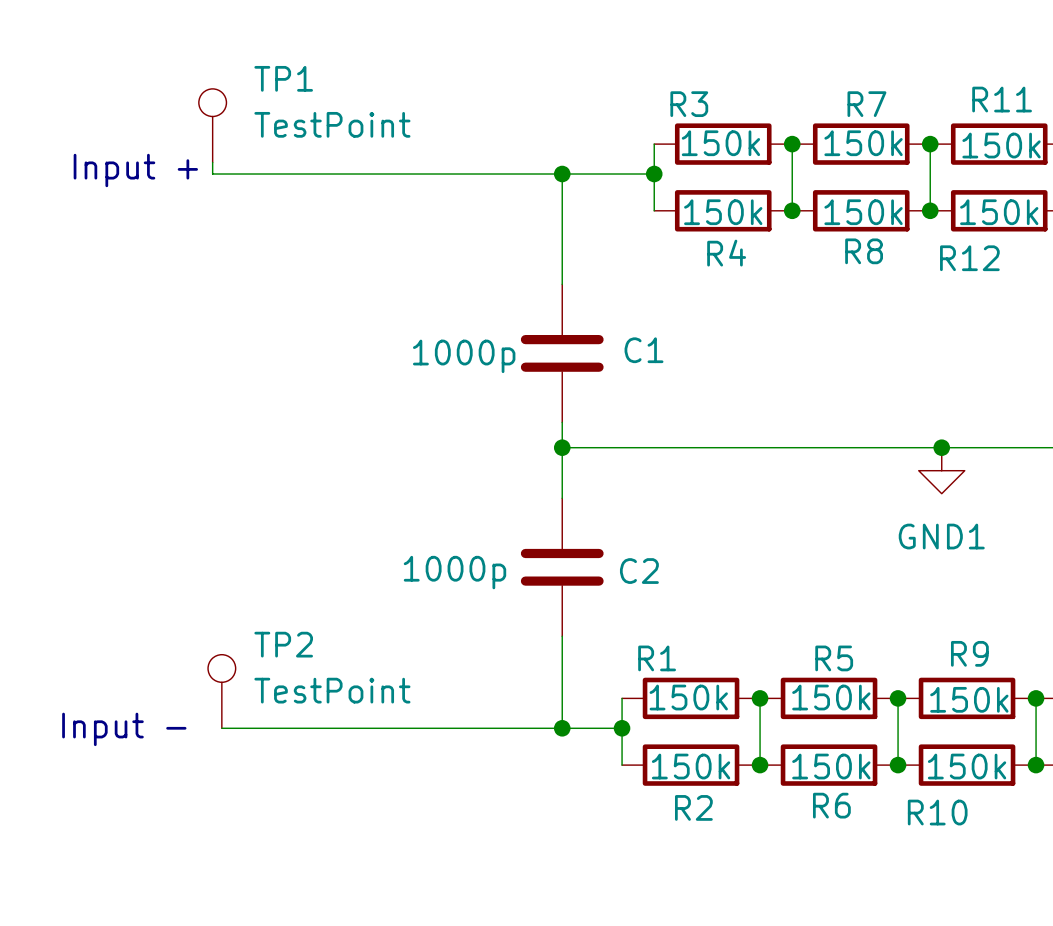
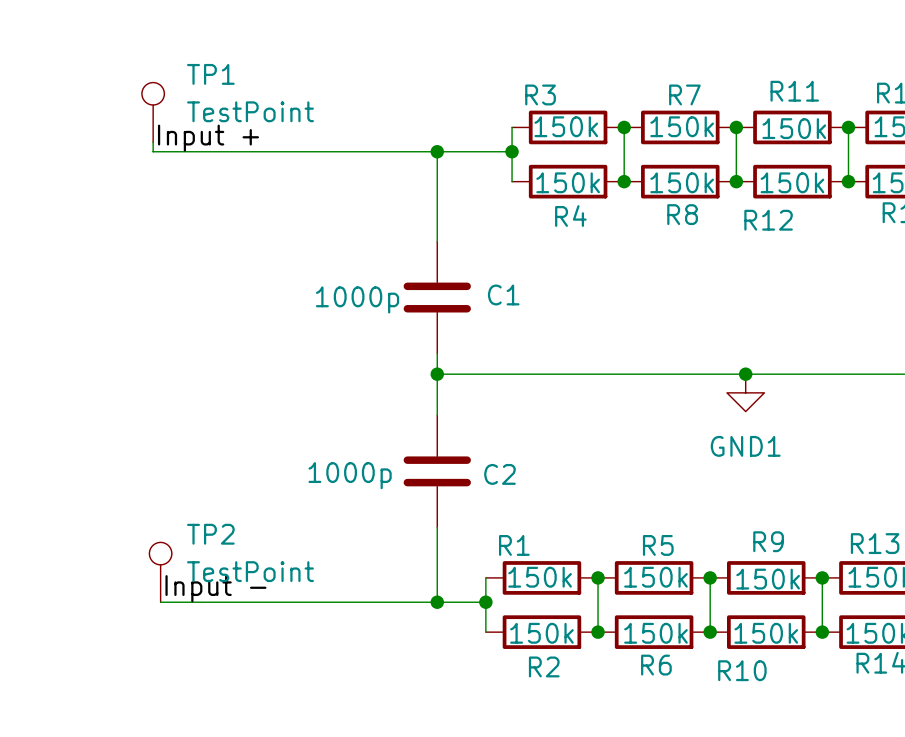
label: none -> Input + (208, 138)
text: Input + (135, 170) -> none
label: none -> Input - (215, 588)
text: Input - (124, 729) -> none

